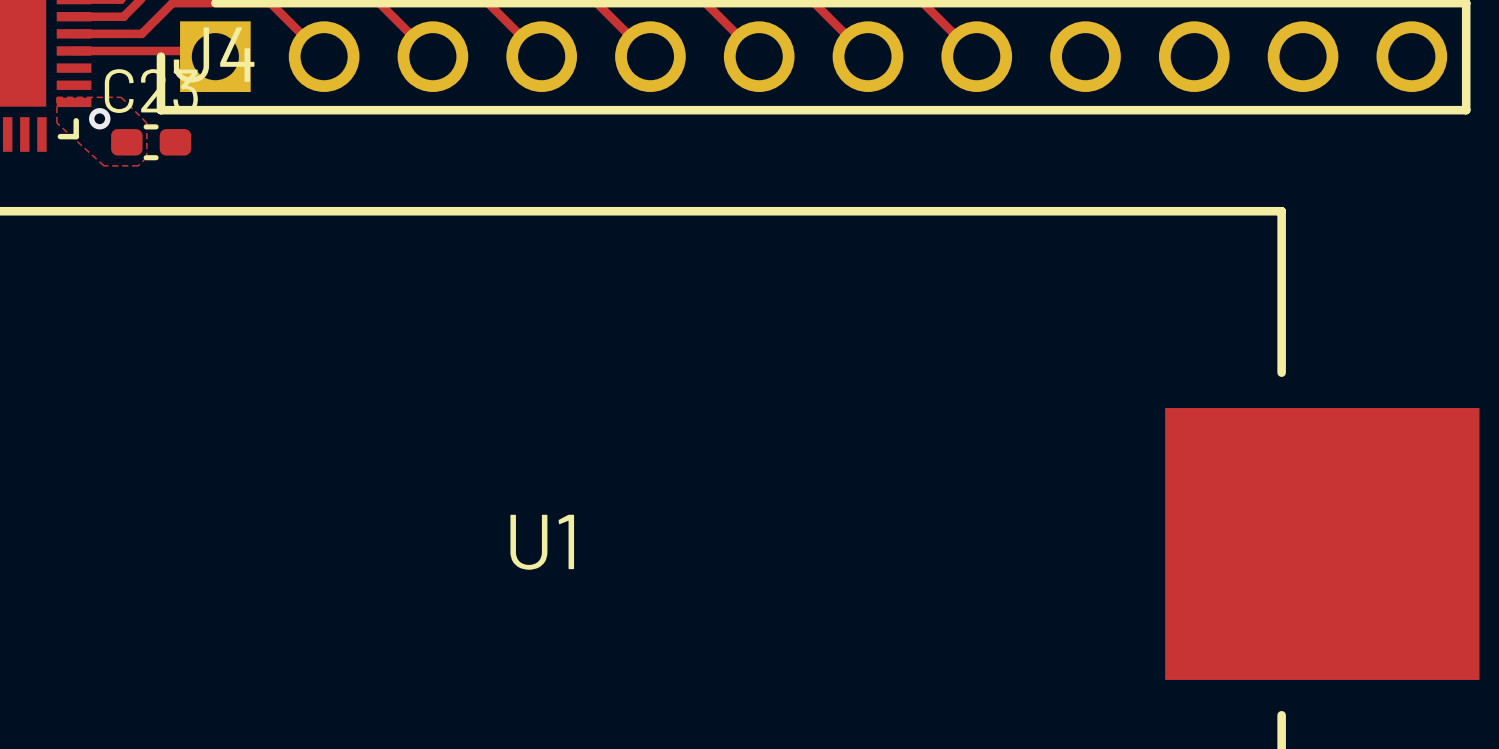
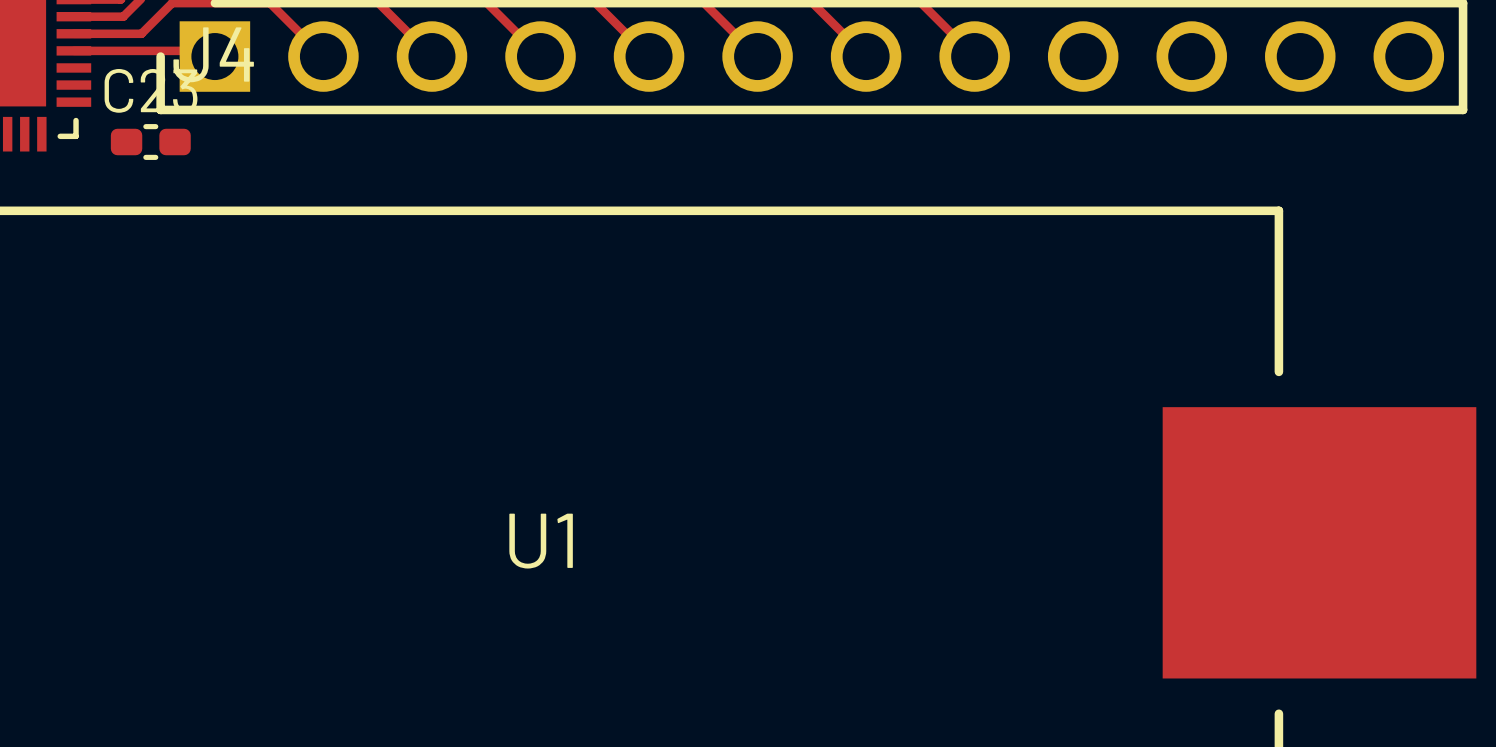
zone outline: (56, 97) (121, 97) (146, 123) (146, 157) (138, 165) (104, 165) (56, 123) (56, 97) -> none
via: (99, 118) -> none

